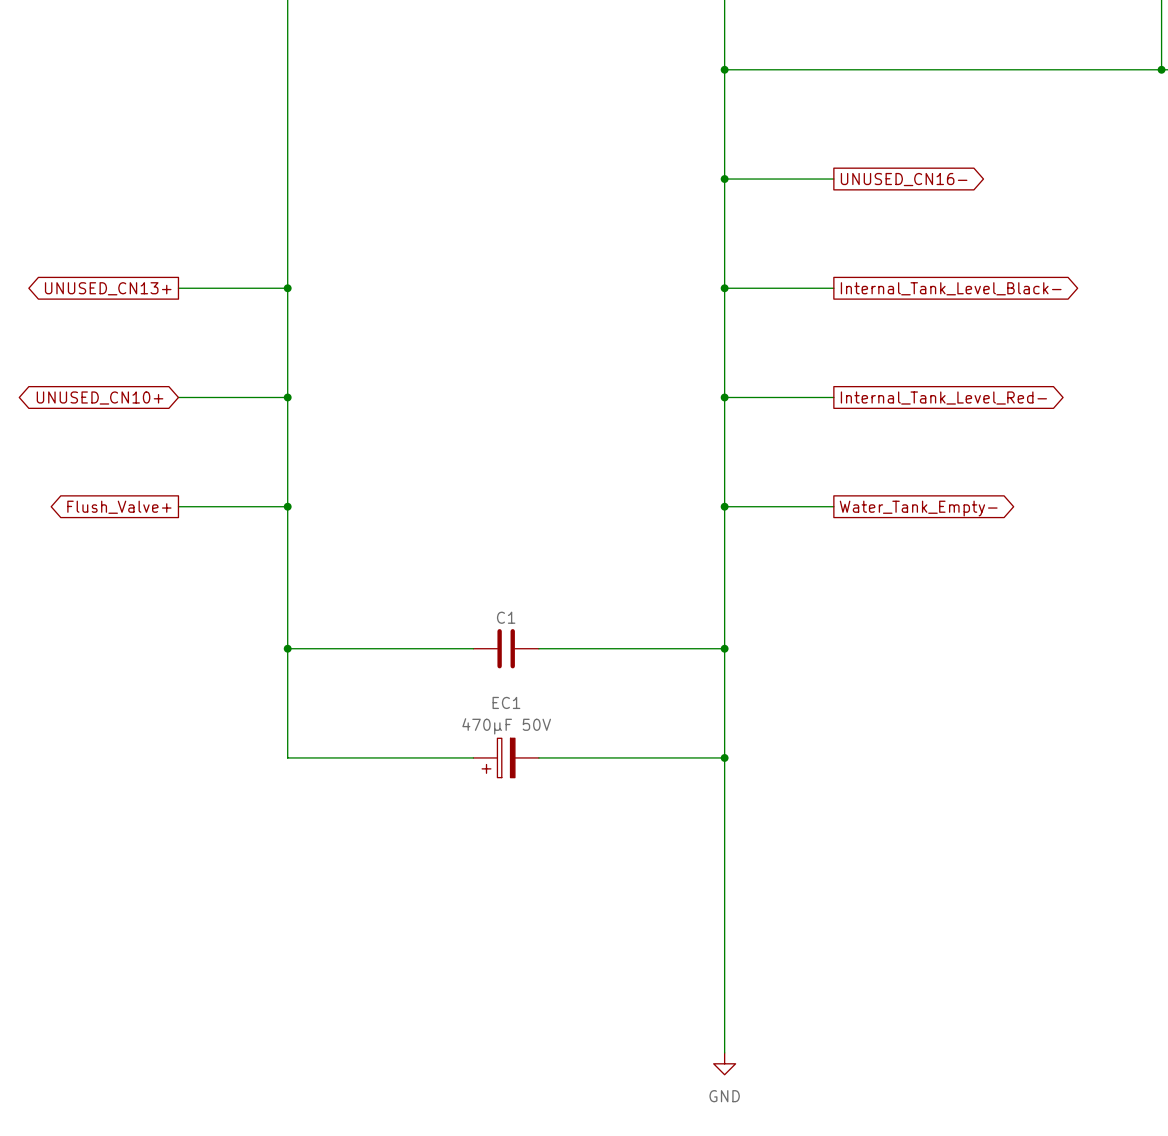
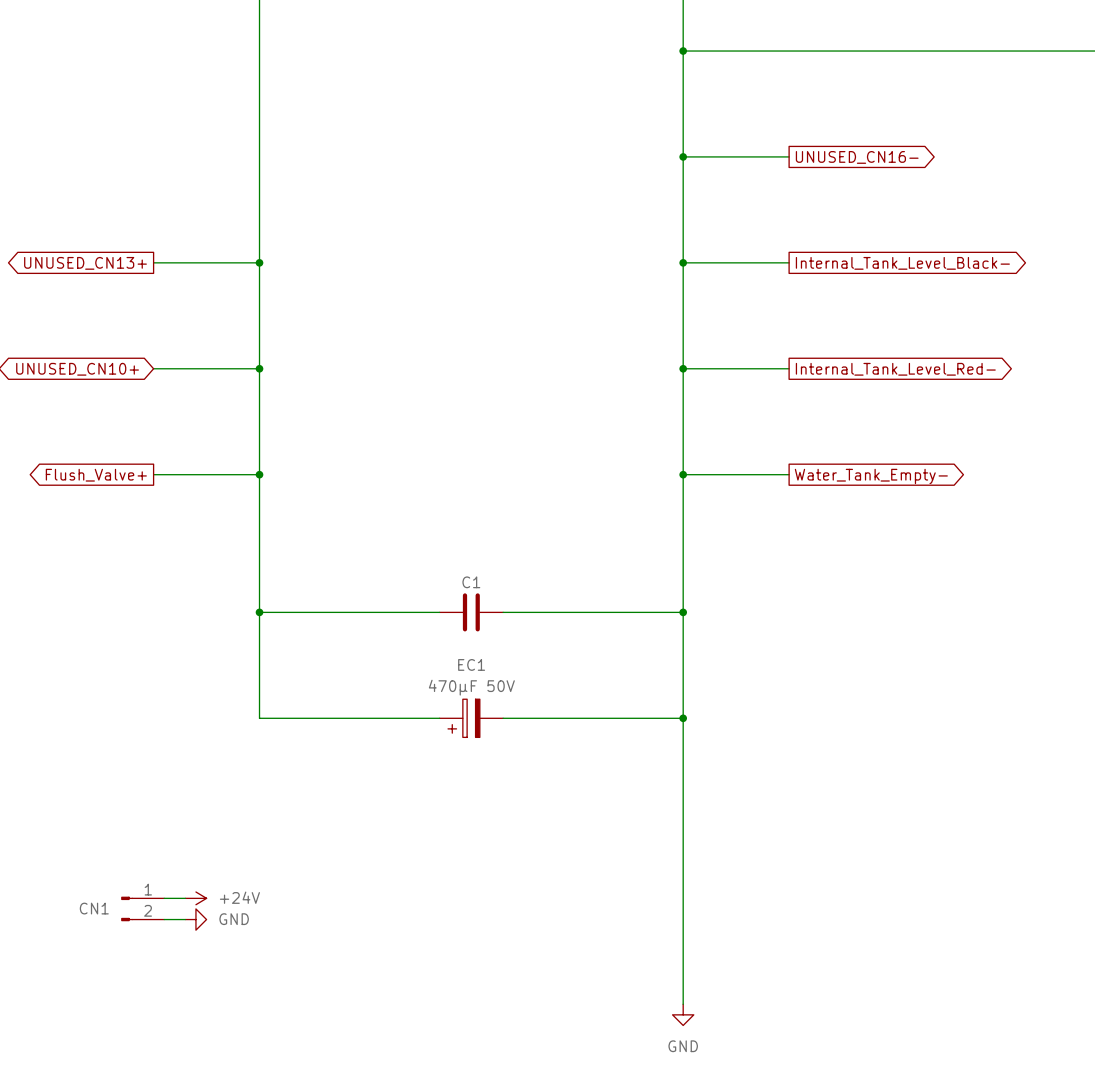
wire: none -> (164, 898) (185, 898)
power symbol: none -> +24V (195, 898)
CN1: none -> (142, 908)
wire: none -> (164, 919) (185, 919)
power symbol: none -> GND (195, 919)

